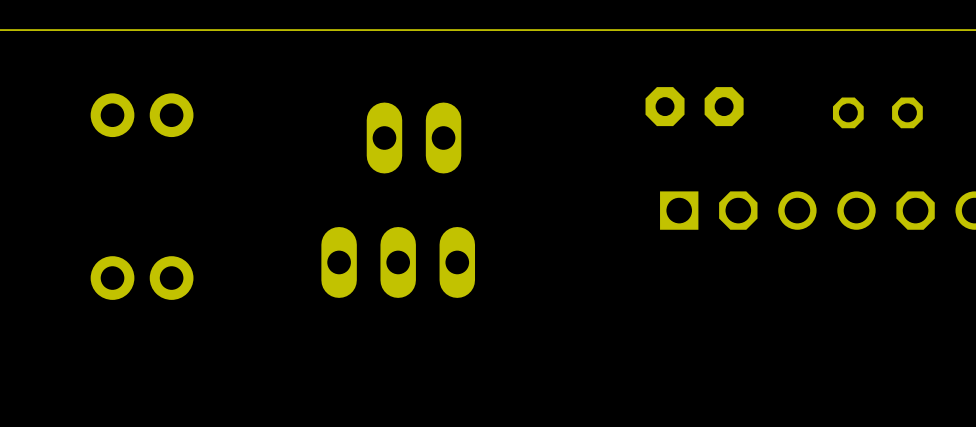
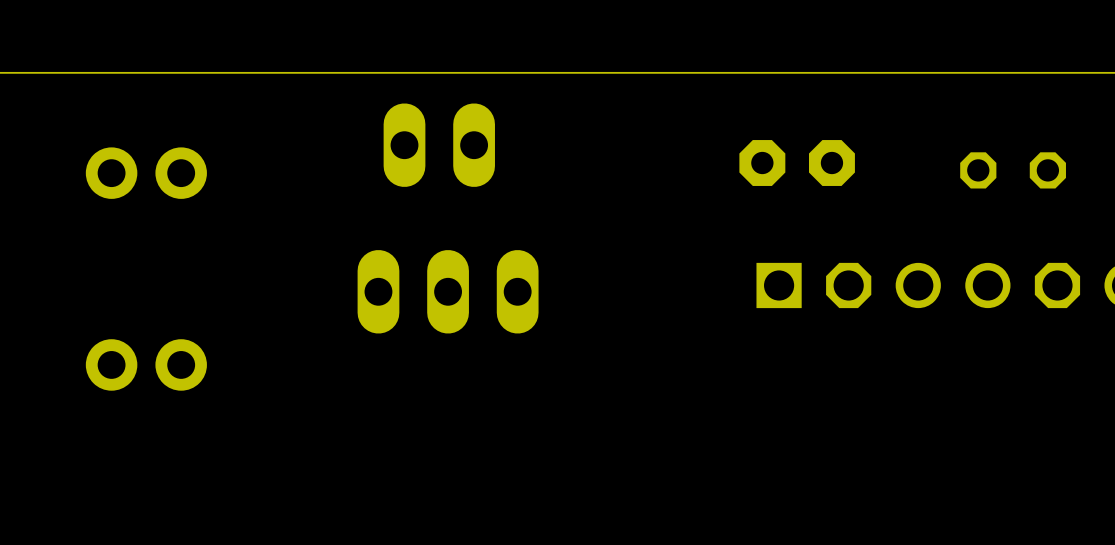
part position: (414, 138) -> (439, 145)
part position: (398, 262) -> (448, 291)

